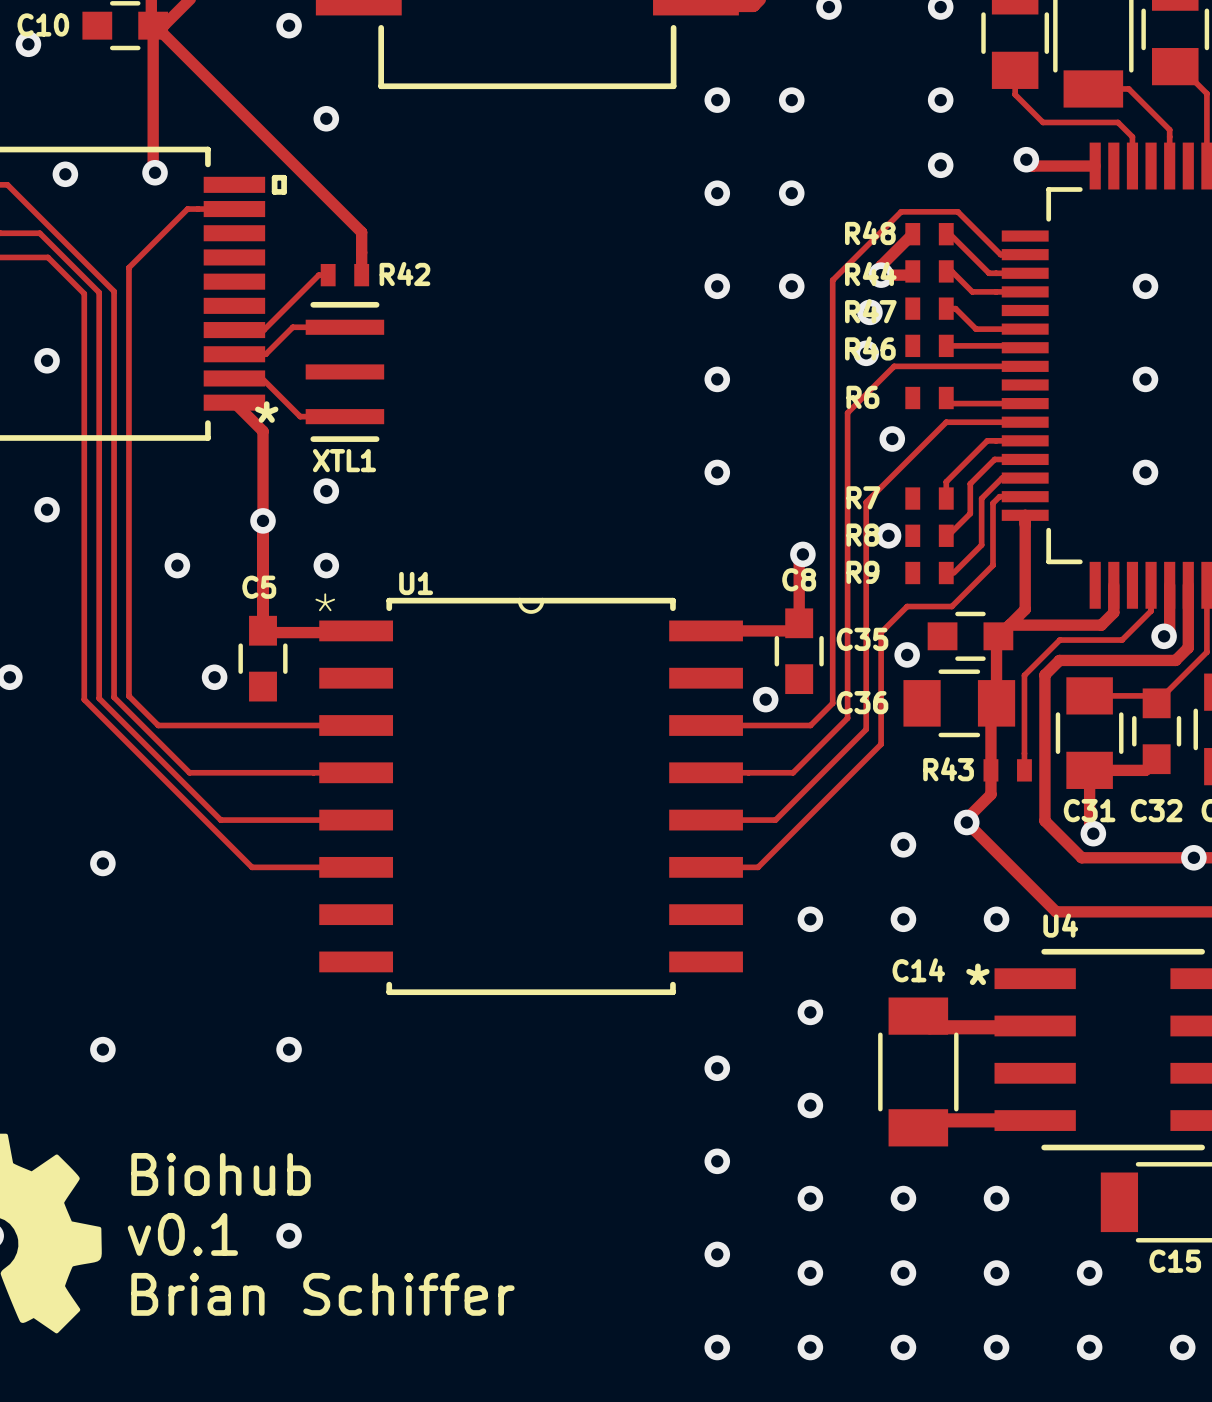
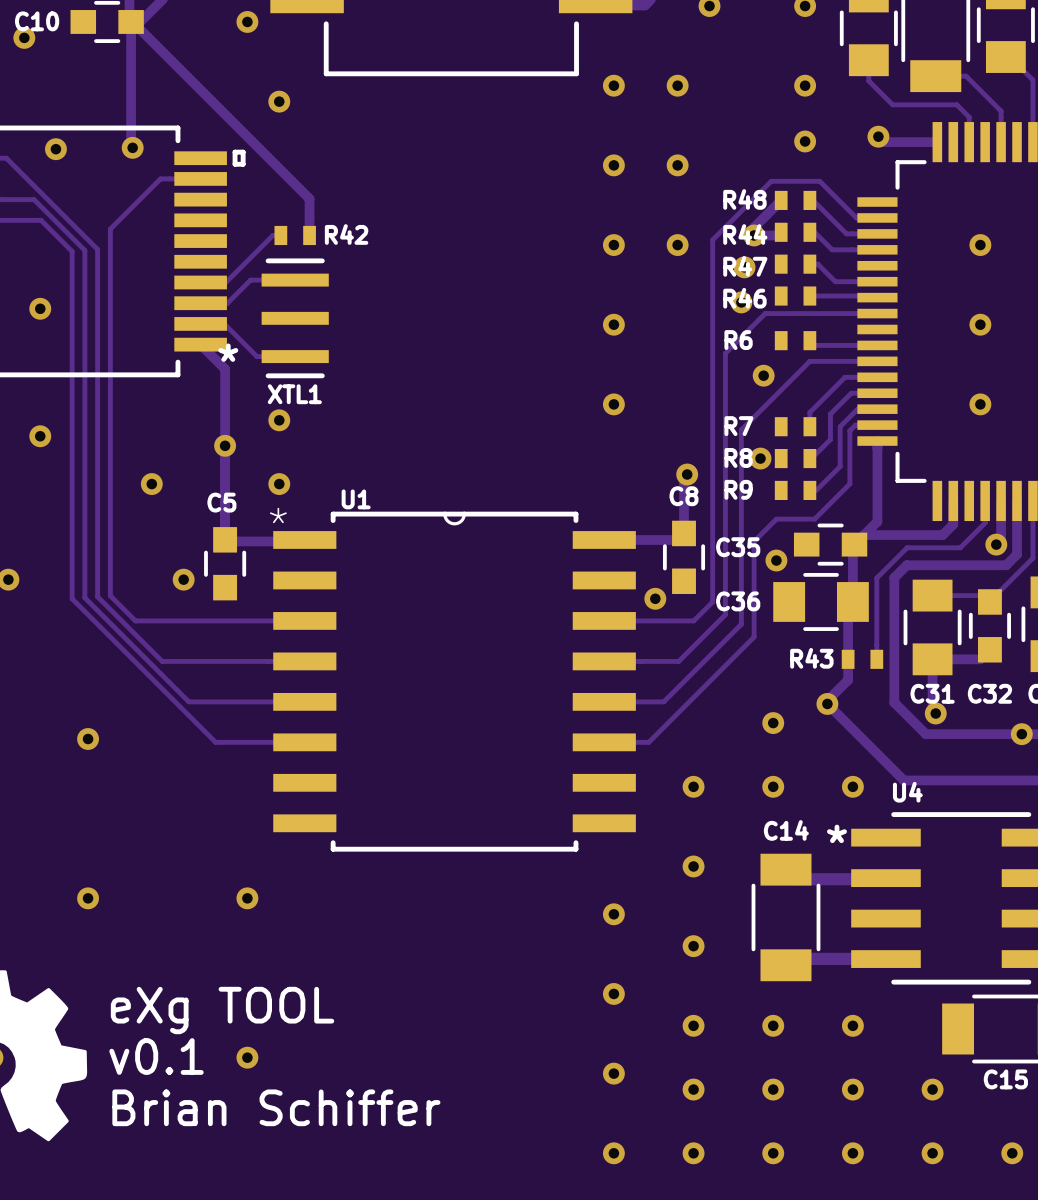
text: Biohub (220, 1174) -> eXg TOOL (222, 1010)

